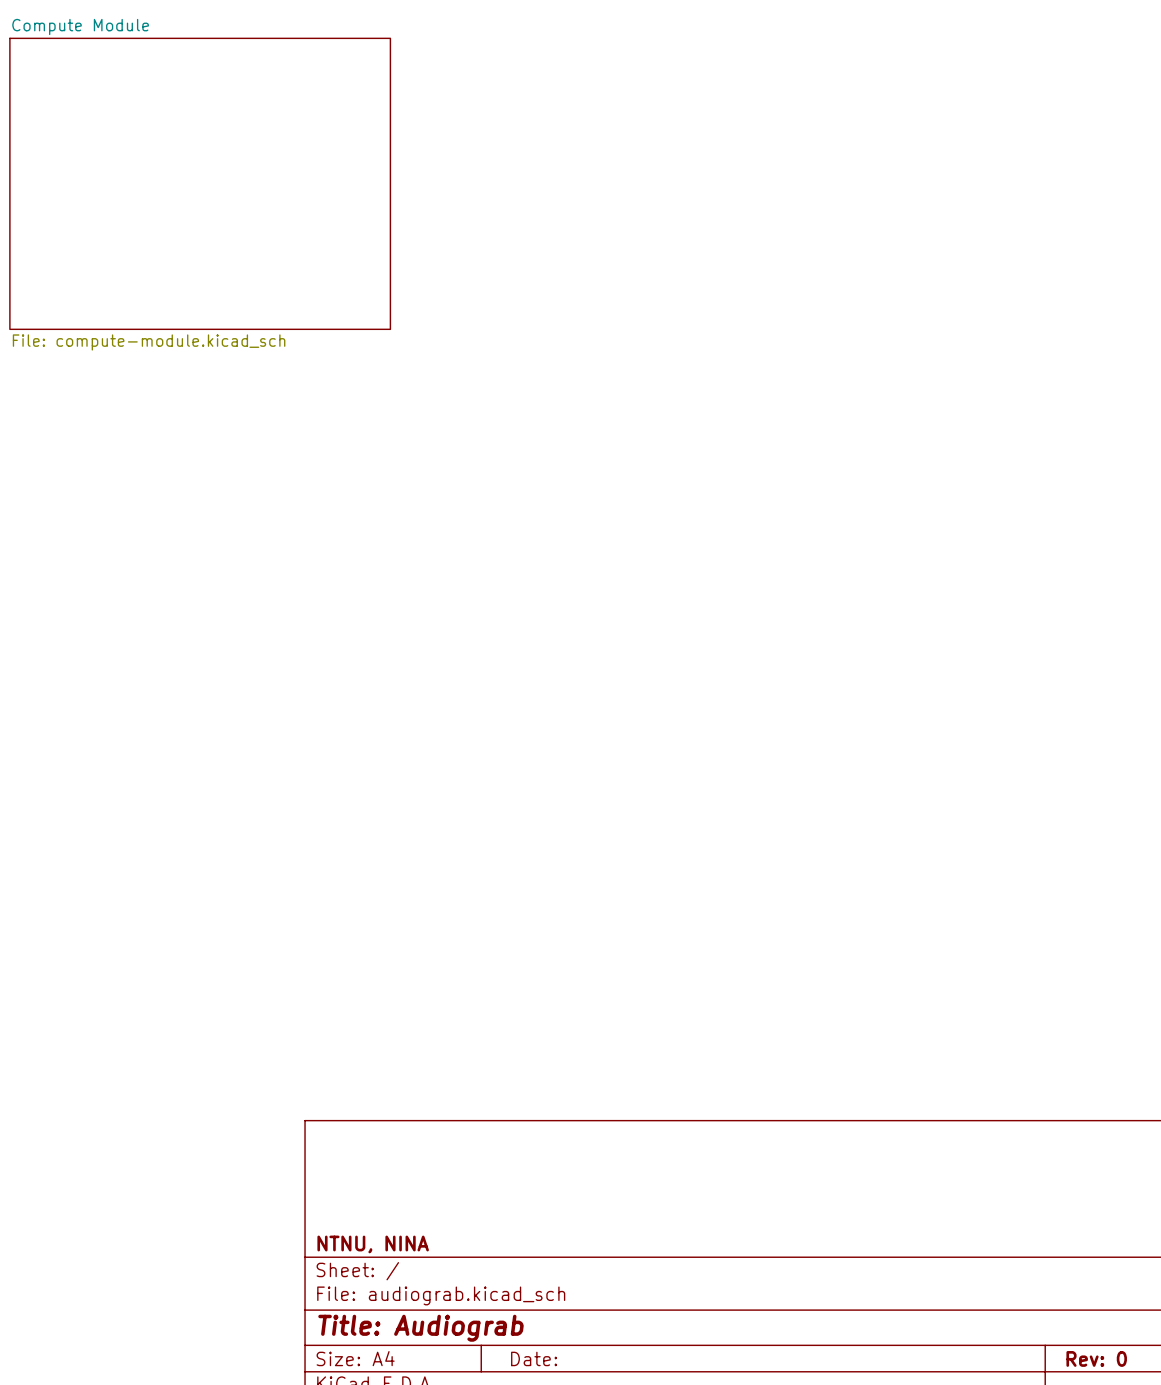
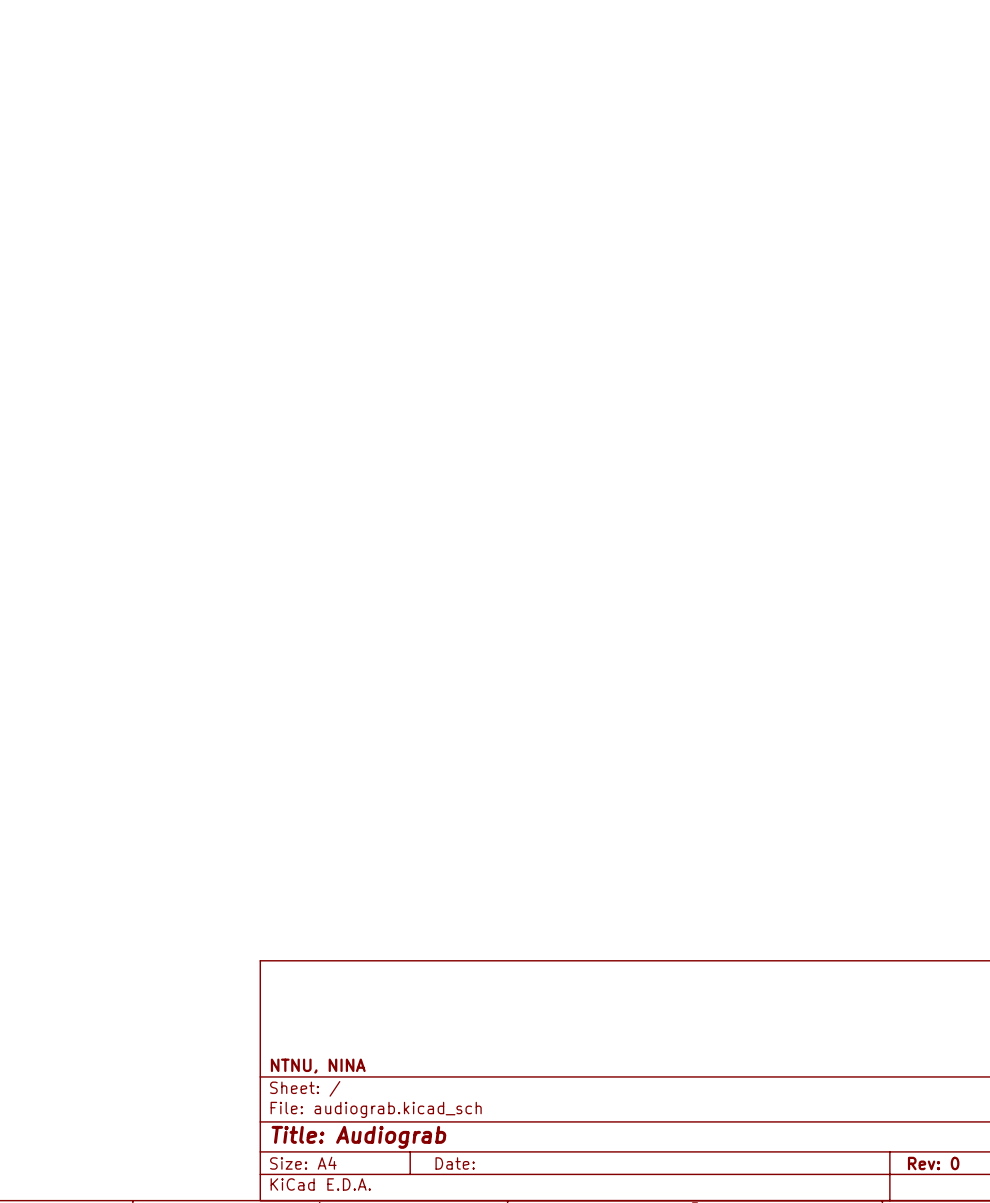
sheet Compute Module: File: compute-module.kicad_sch (200, 183) -> none

